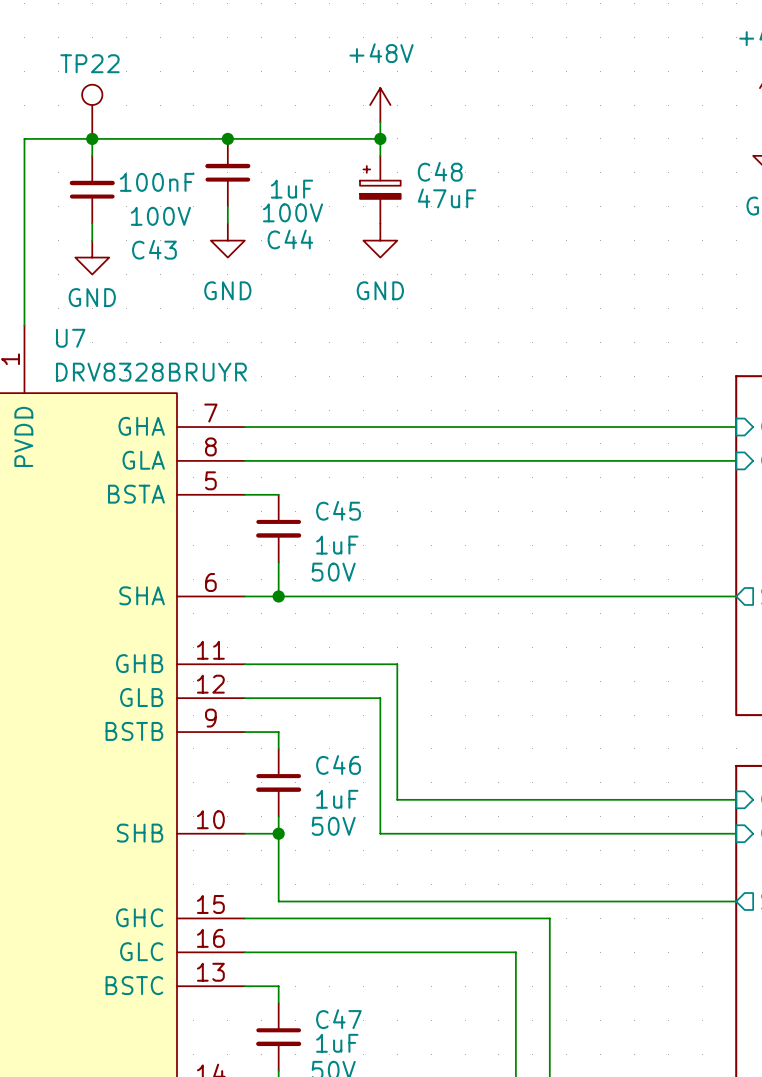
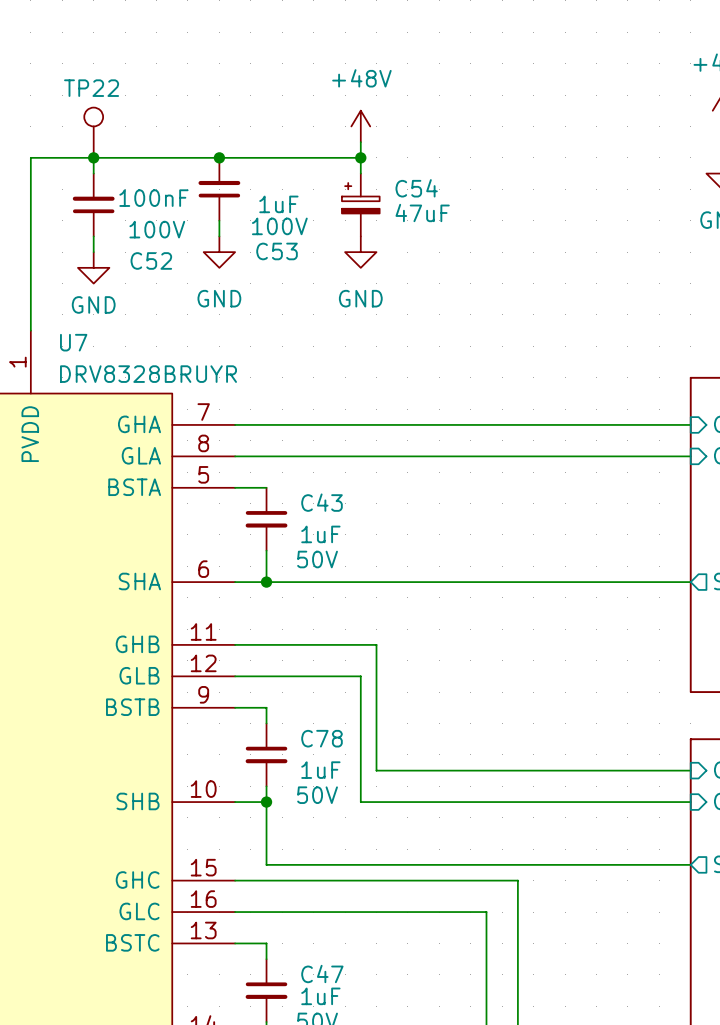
C48 name: C48 (440, 171) -> C54 (416, 188)
C44 name: C44 (290, 239) -> C53 (277, 251)
C43 name: C43 (154, 249) -> C52 (151, 260)
C45 name: C45 (338, 510) -> C43 (322, 502)
C46 name: C46 (338, 764) -> C78 (322, 738)

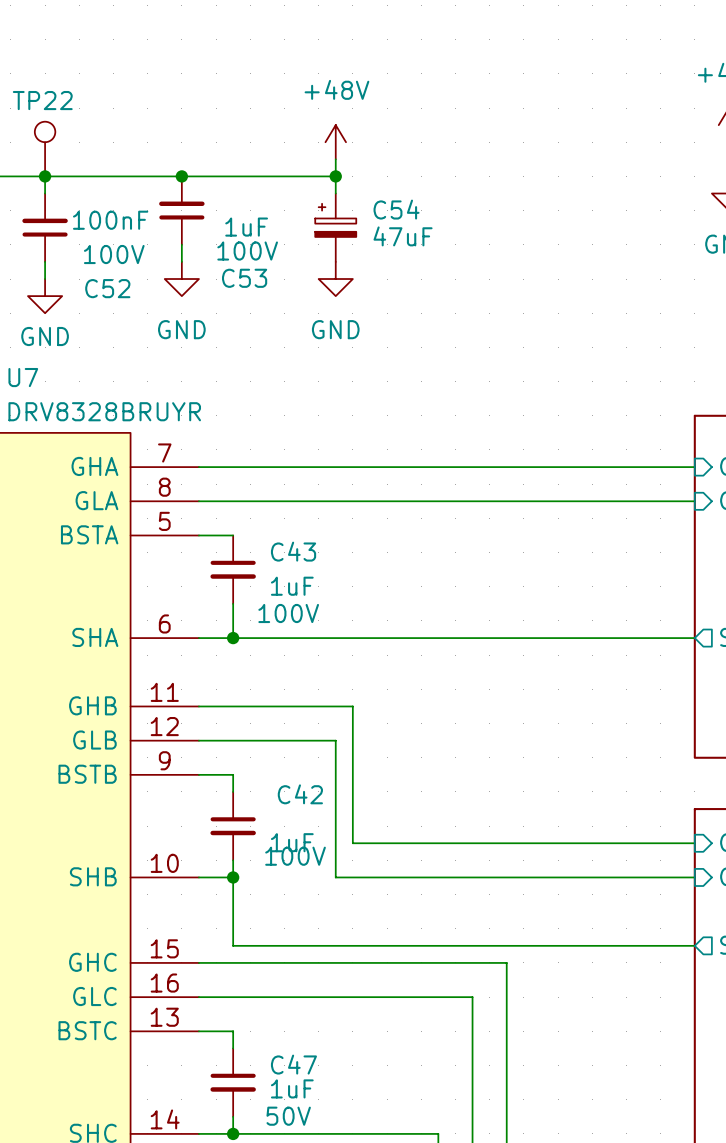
C43 text: 50V (317, 559) -> 100V (288, 613)
C78 name: C78 (322, 738) -> C42 (300, 794)
C78 text: 50V (317, 795) -> 100V (295, 856)

